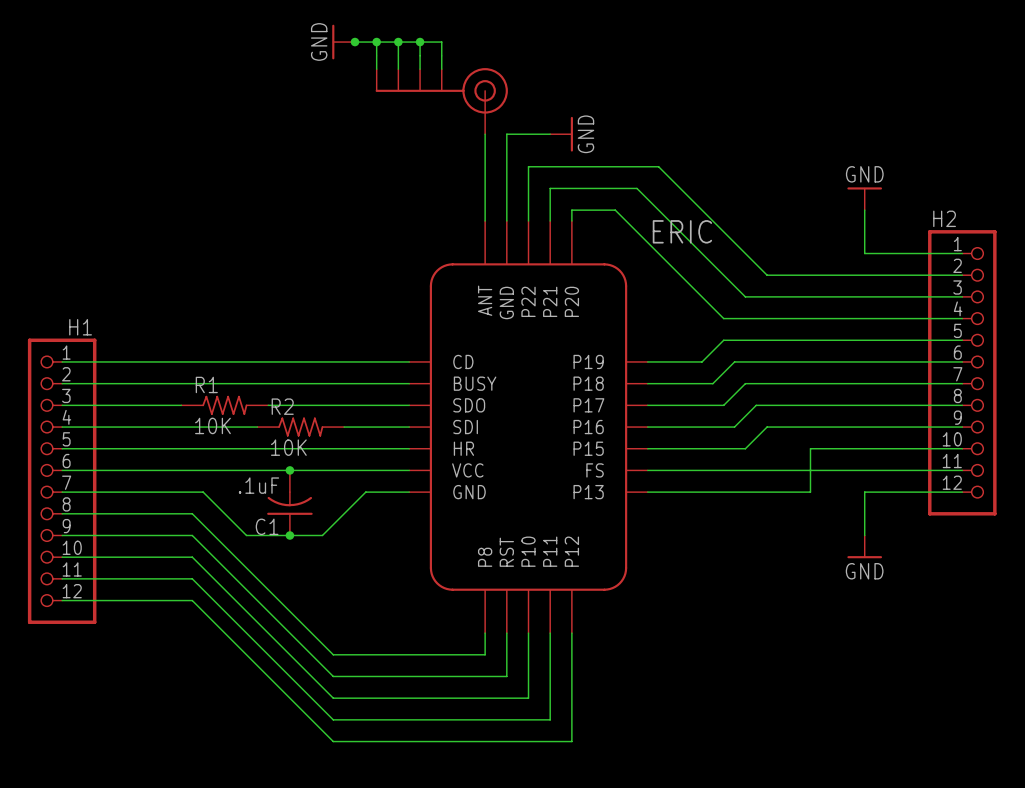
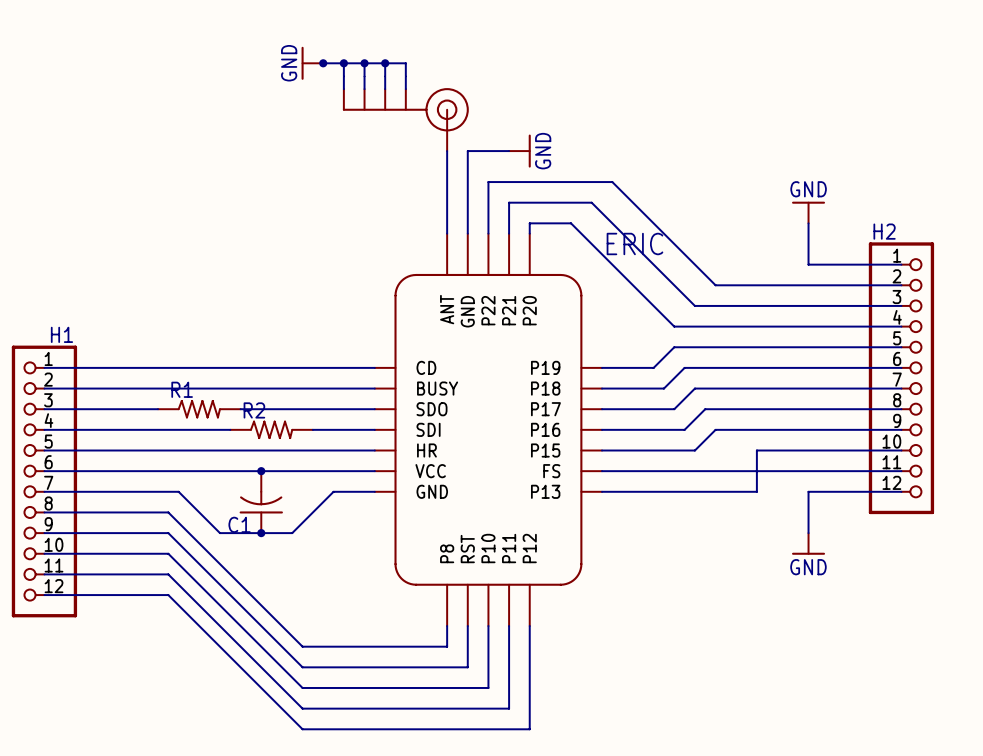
R1 value: 10K (212, 425) -> none
R2 value: 10K (288, 447) -> none
C1 value: .1uF (258, 485) -> none

